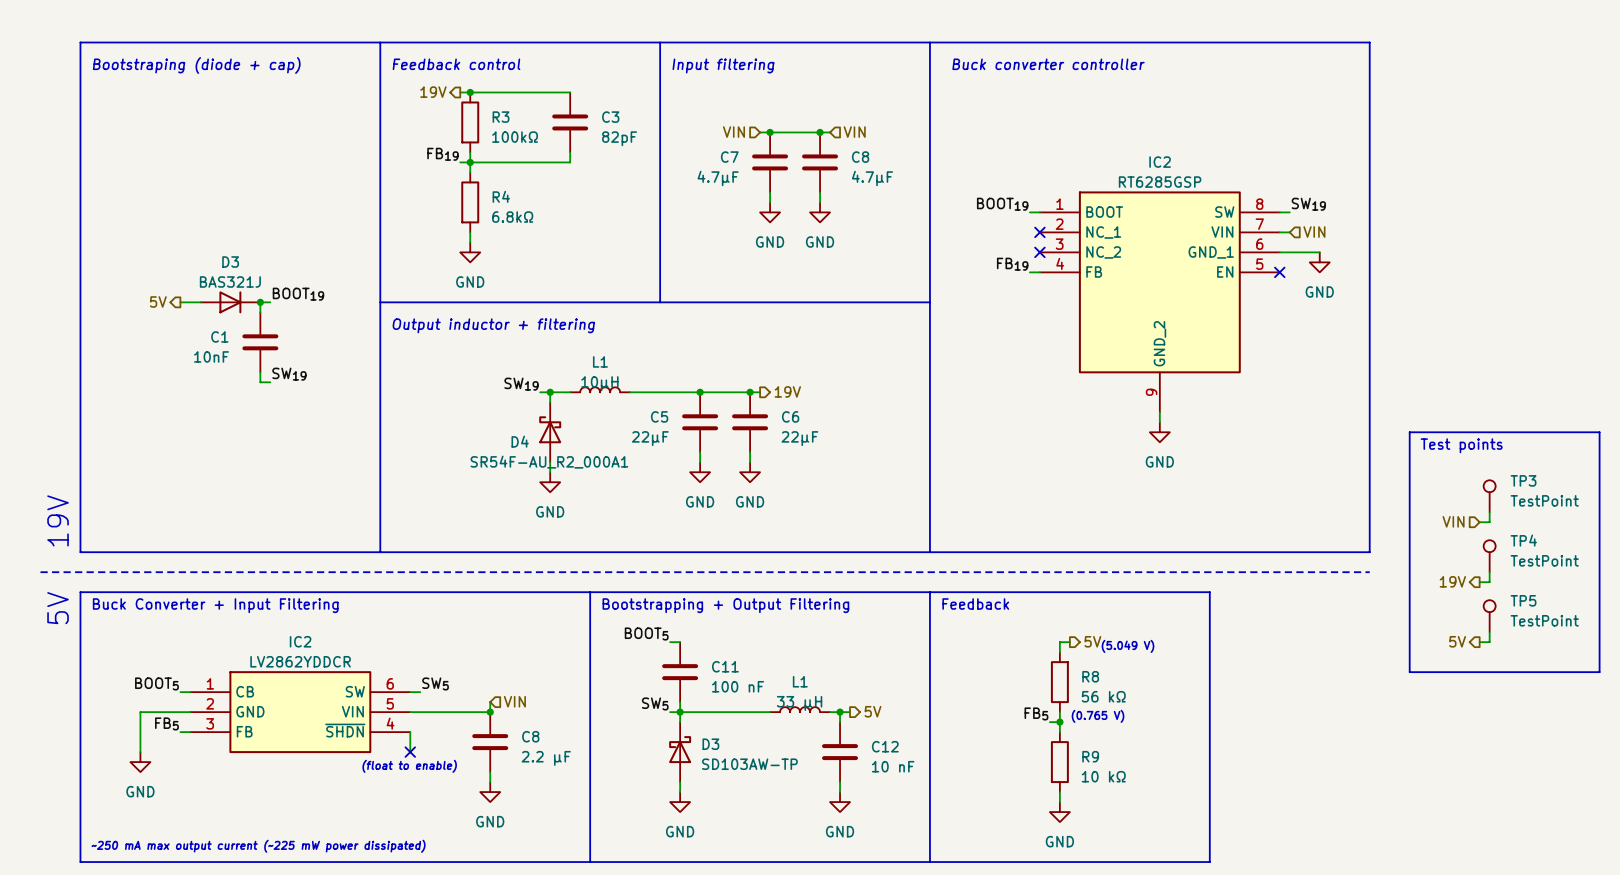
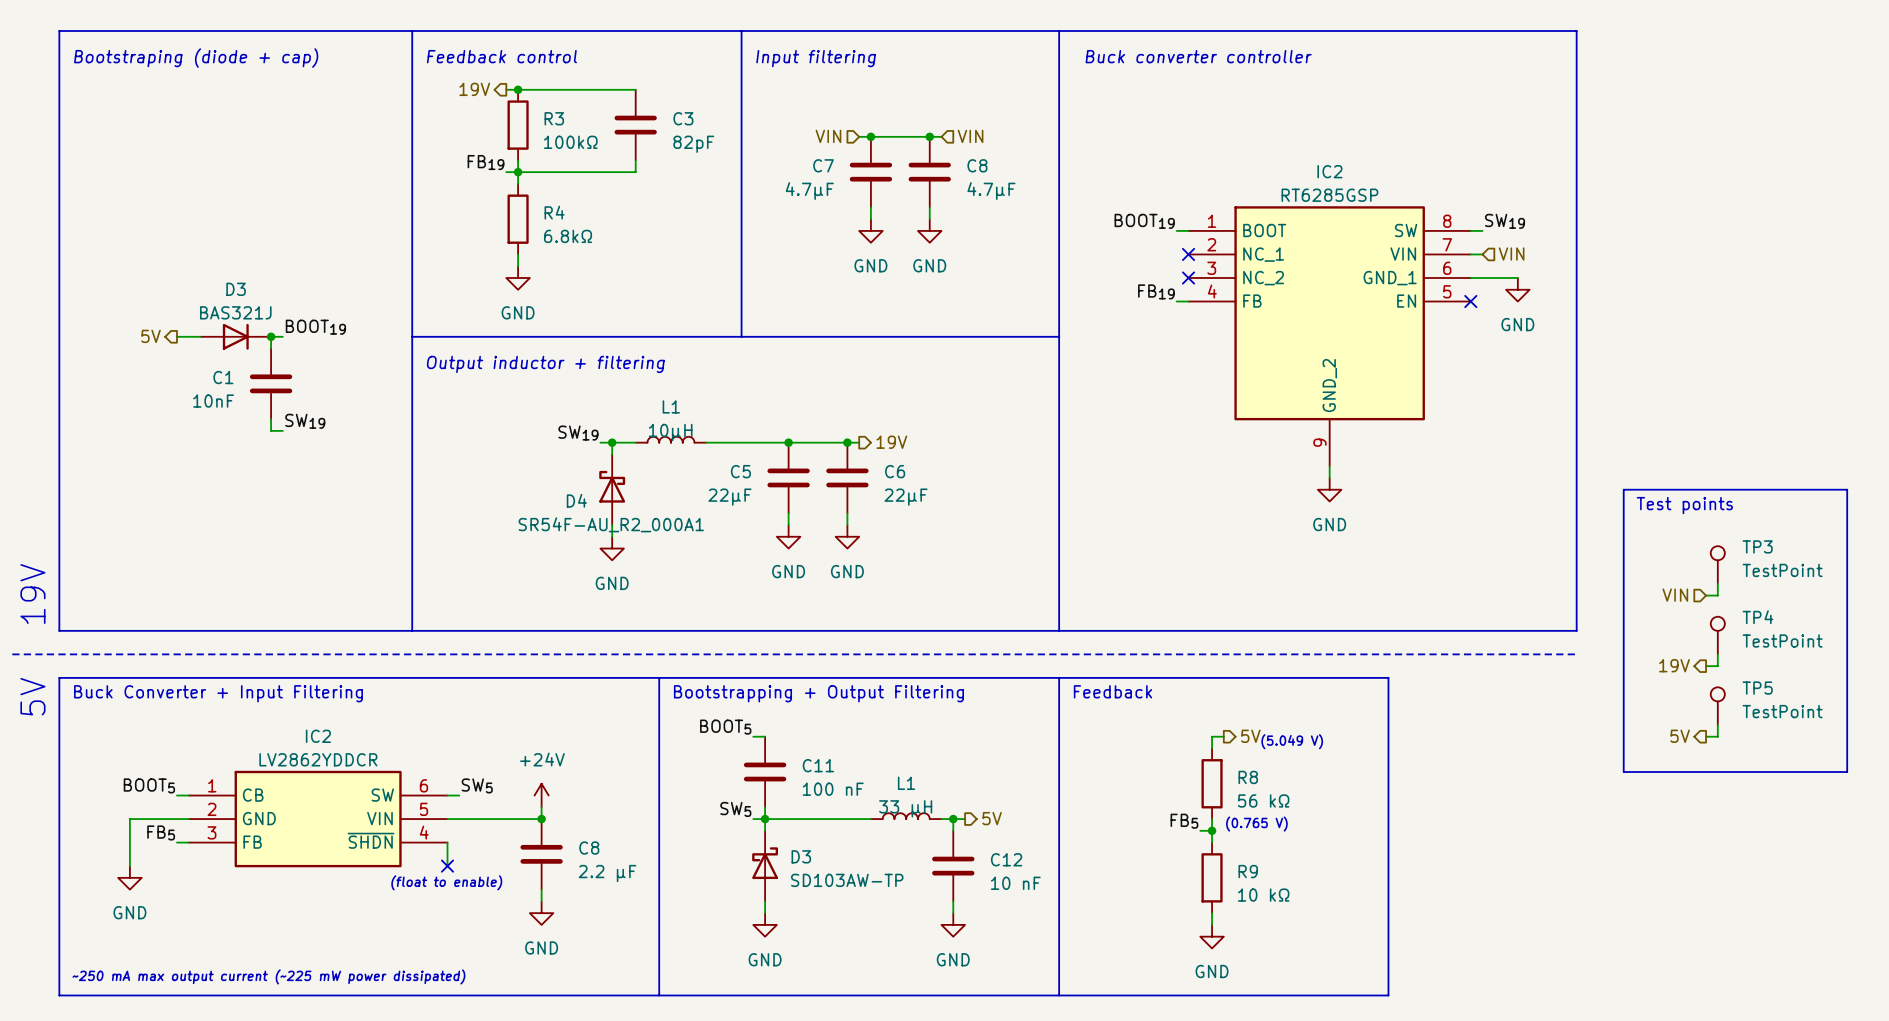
power symbol: none -> +24V (541, 795)
hierarchical label: VIN (514, 701) -> none

